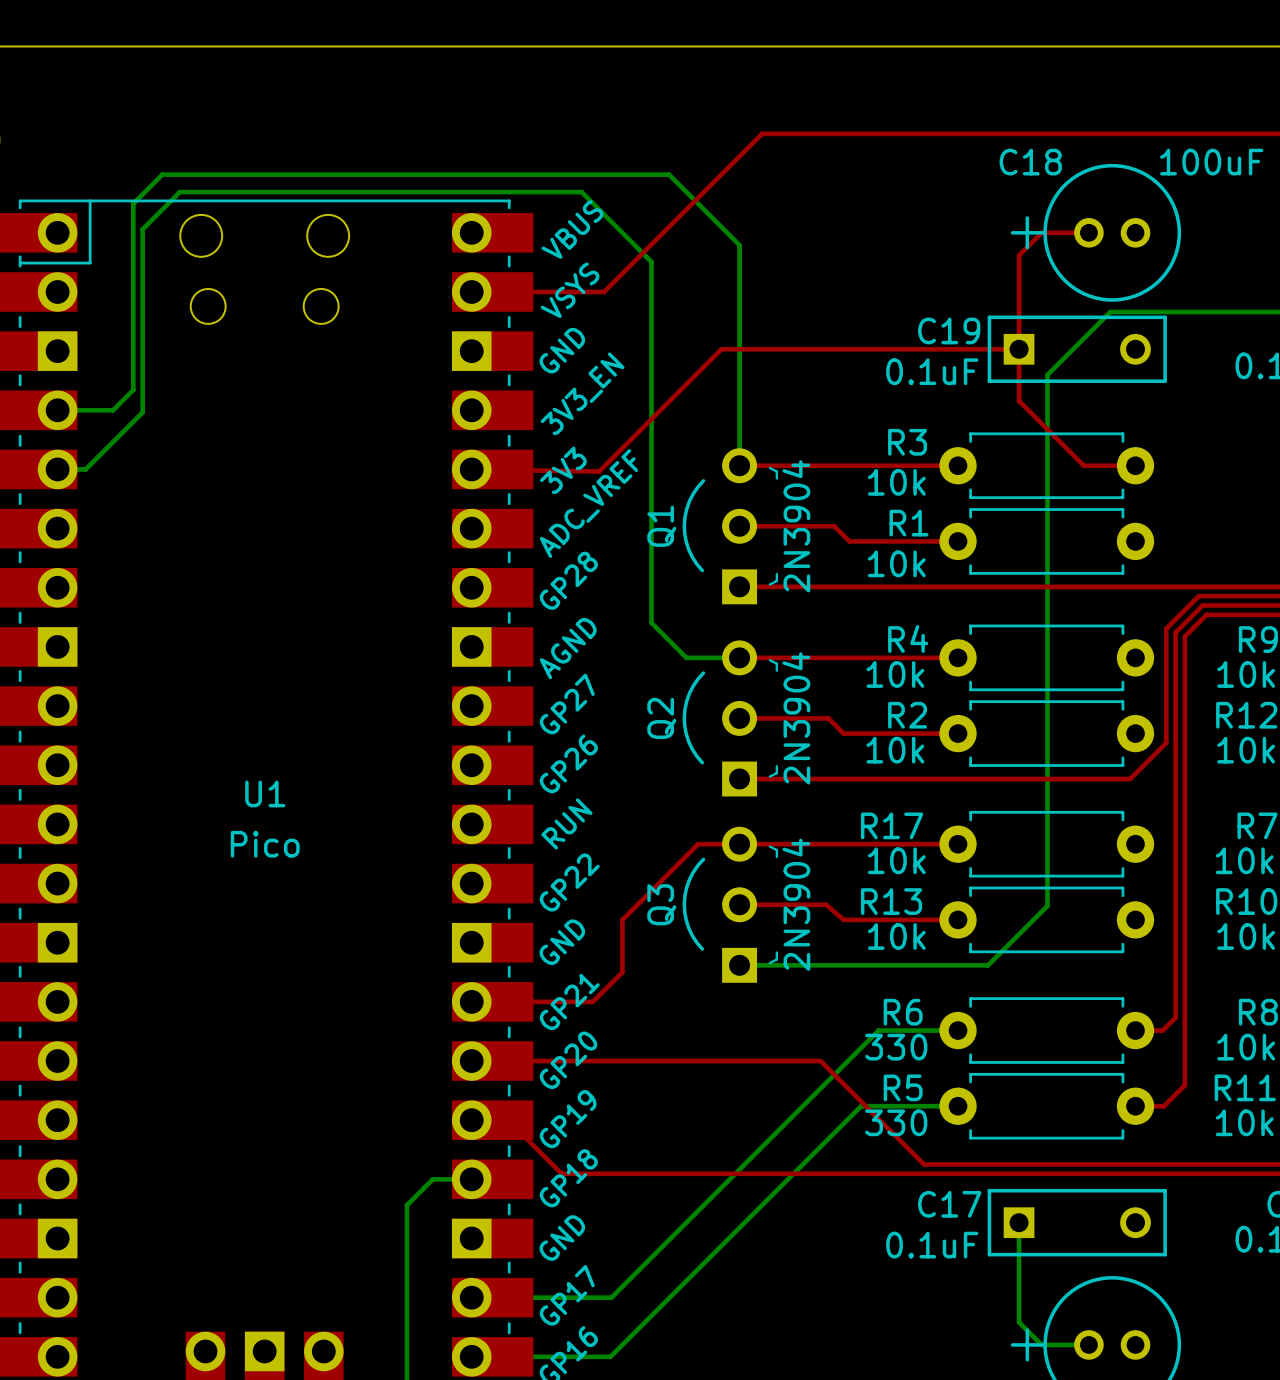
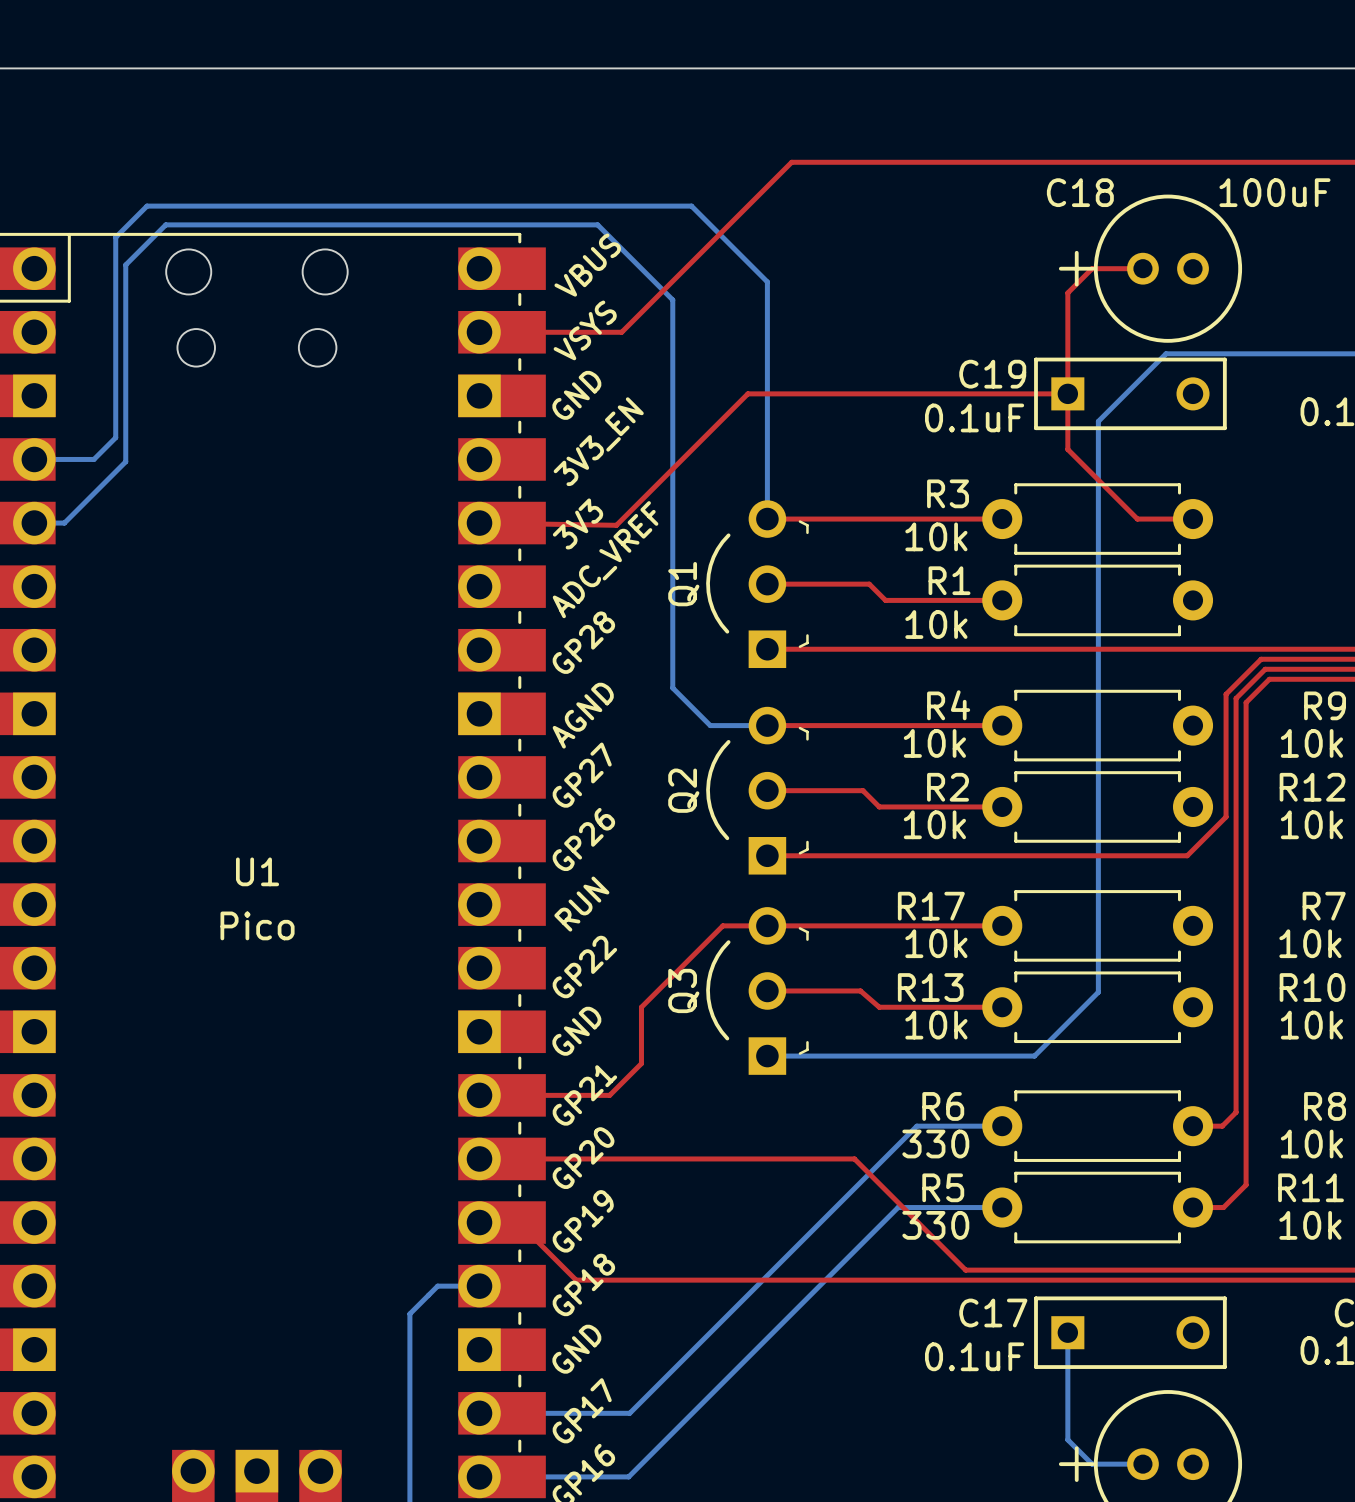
Q1 value: 2N3904 (796, 526) -> none
Q2 value: 2N3904 (796, 718) -> none
Q3 value: 2N3904 (796, 904) -> none

